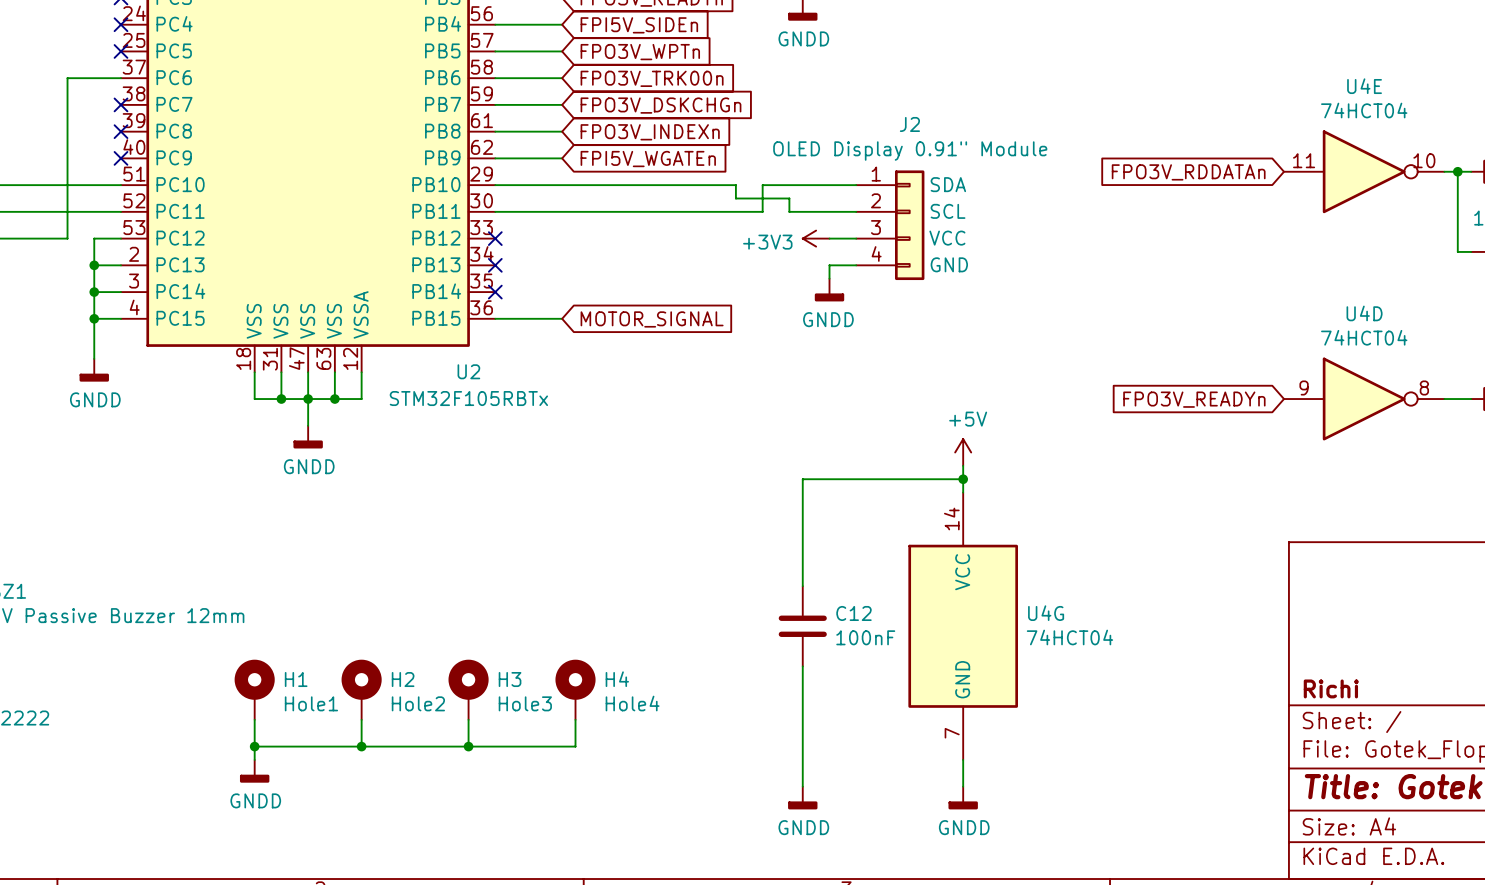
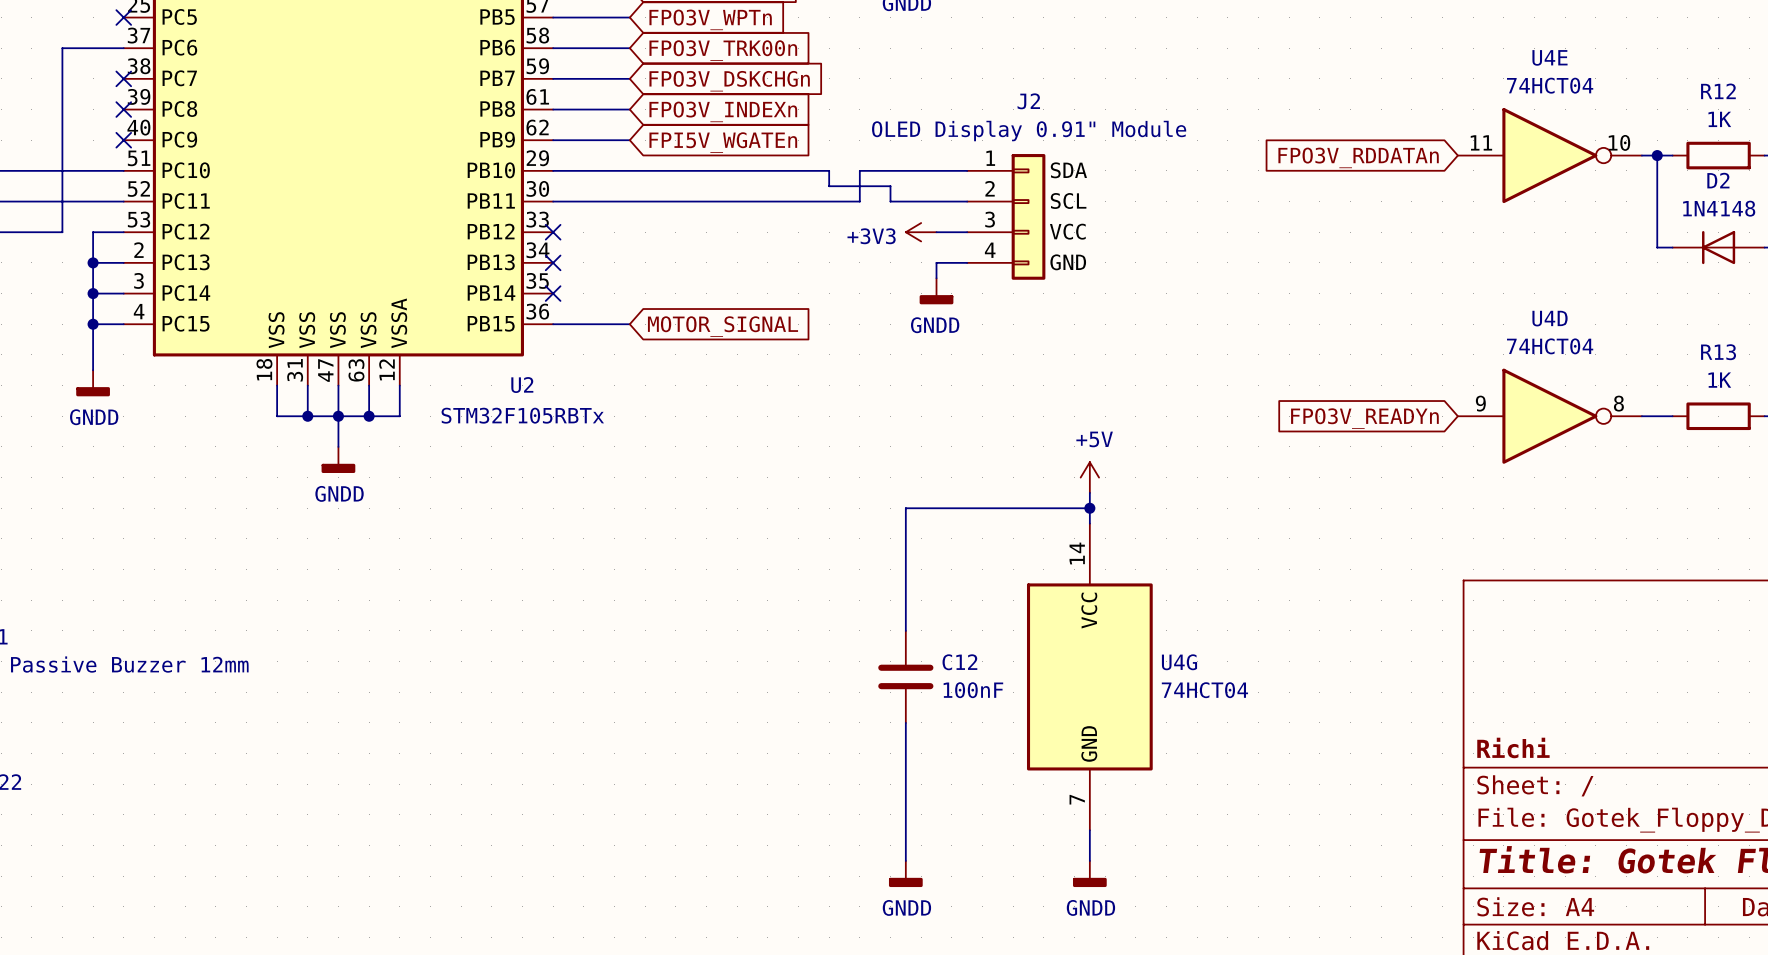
H1: Hole1 (254, 689) -> none
H2: Hole2 (361, 689) -> none
H3: Hole3 (468, 689) -> none
H4: Hole4 (575, 689) -> none
wire: (254, 719) (254, 759) -> none
wire: (361, 719) (361, 746) -> none
wire: (468, 719) (468, 746) -> none
wire: (575, 719) (575, 746) (254, 746) -> none
junction: (254, 746) -> none
junction: (361, 746) -> none
junction: (468, 746) -> none
power symbol: GNDD (254, 771) -> none

